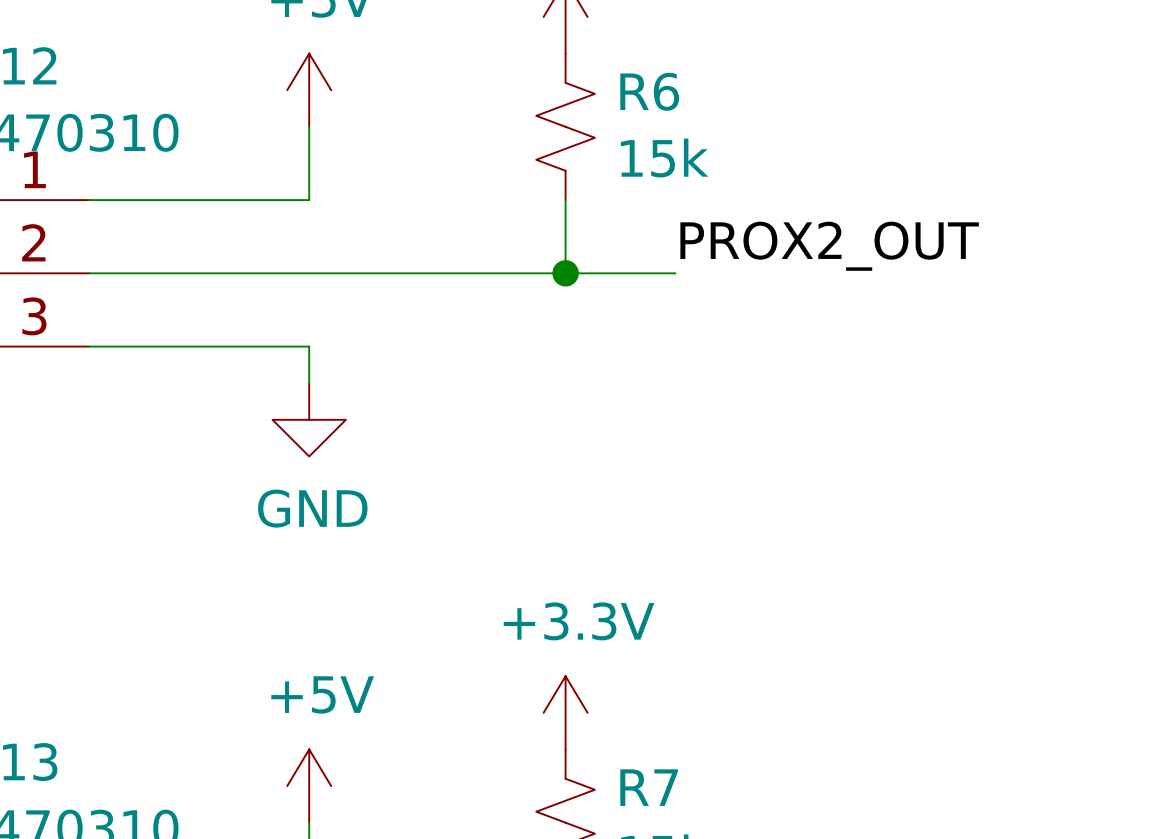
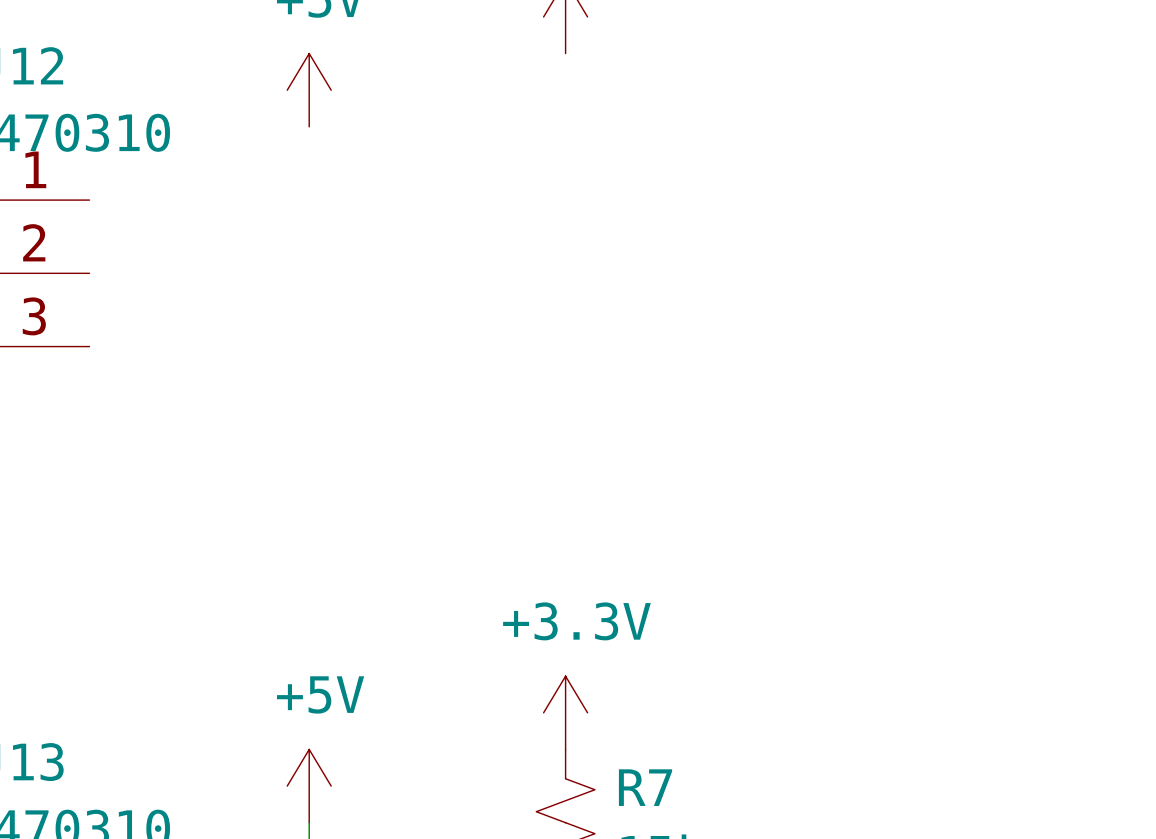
wire: (309, 126) (309, 200) (89, 200) -> none
R6: 15k (565, 126) -> none
wire: (565, 200) (565, 273) -> none
label: PROX2_OUT (829, 246) -> none
wire: (89, 273) (675, 273) -> none
junction: (565, 273) -> none
wire: (89, 346) (309, 346) (309, 383) -> none
power symbol: GND (309, 419) -> none

